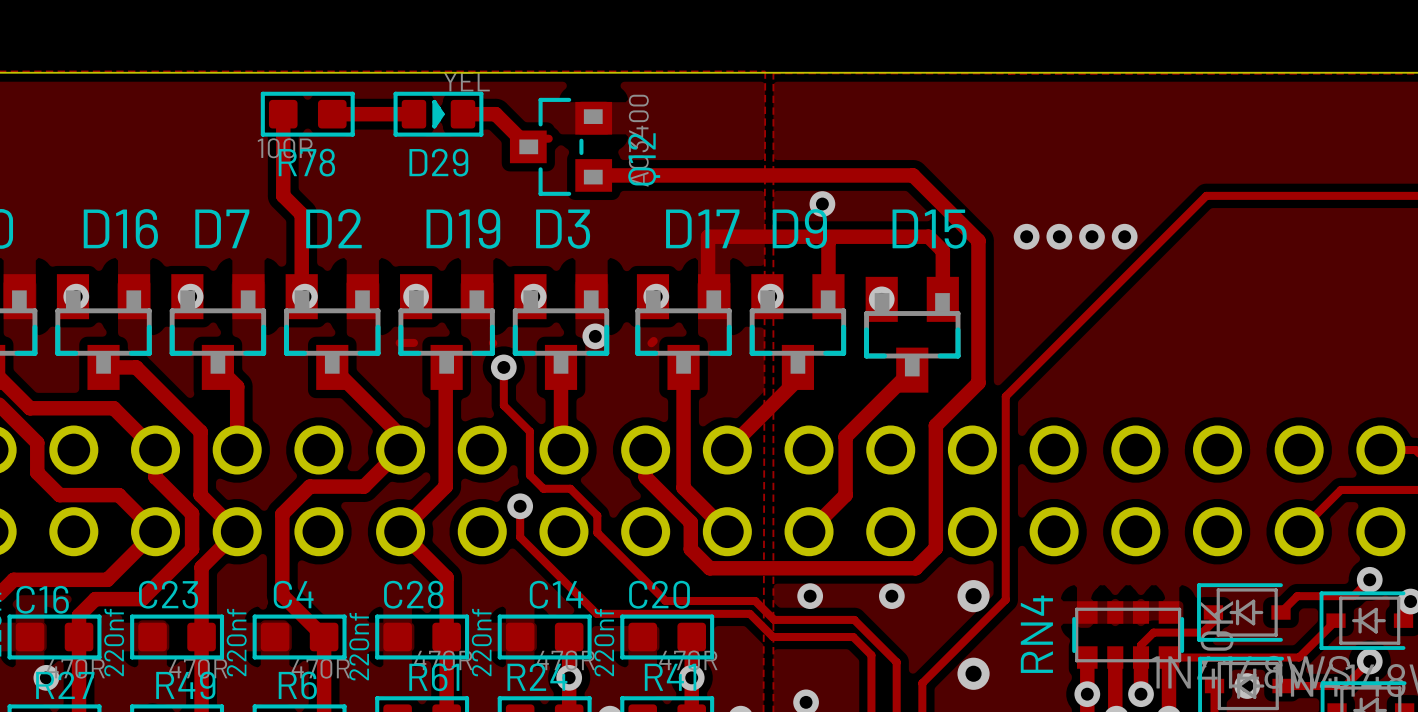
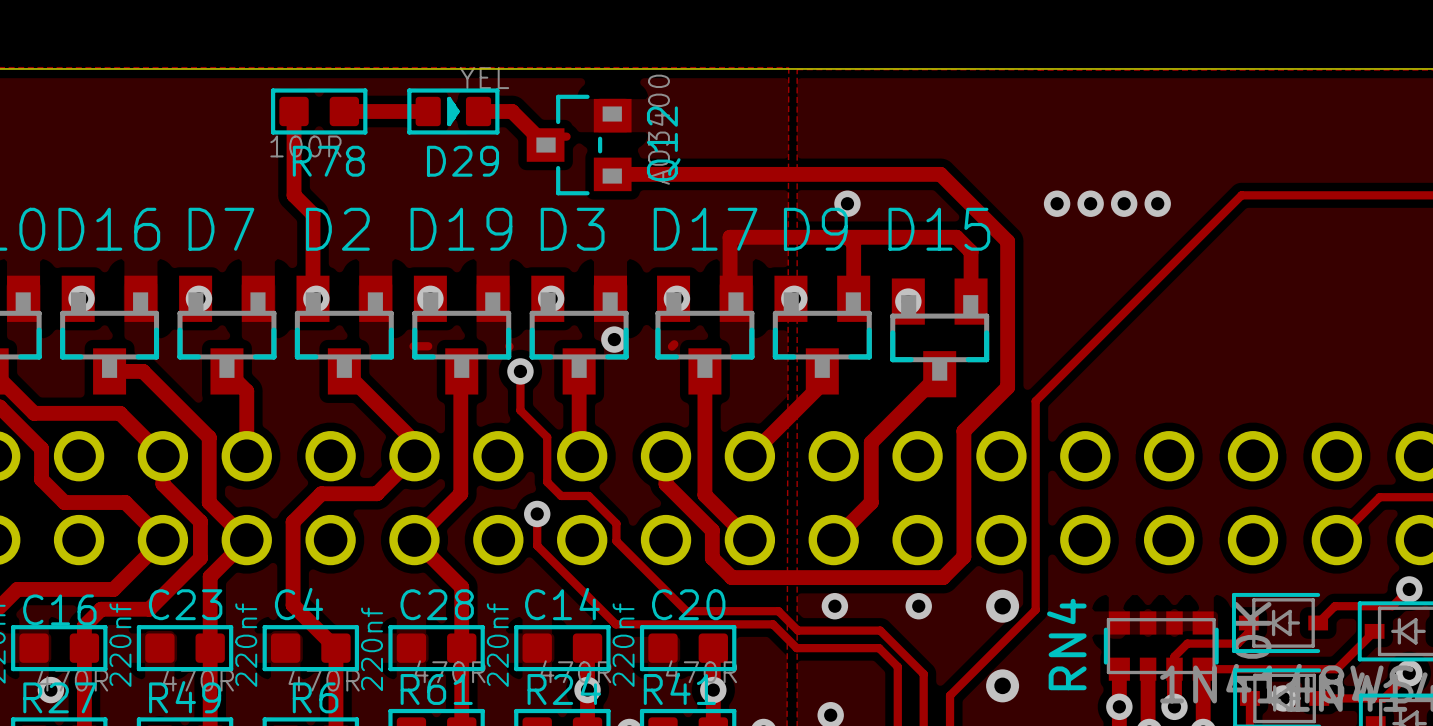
via: none -> (1057, 203)
via: none -> (1090, 203)
via: none -> (1124, 203)
via: none -> (1157, 203)
via: (1026, 236) -> none
via: (1059, 236) -> none
via: (1091, 236) -> none
via: (1124, 236) -> none

